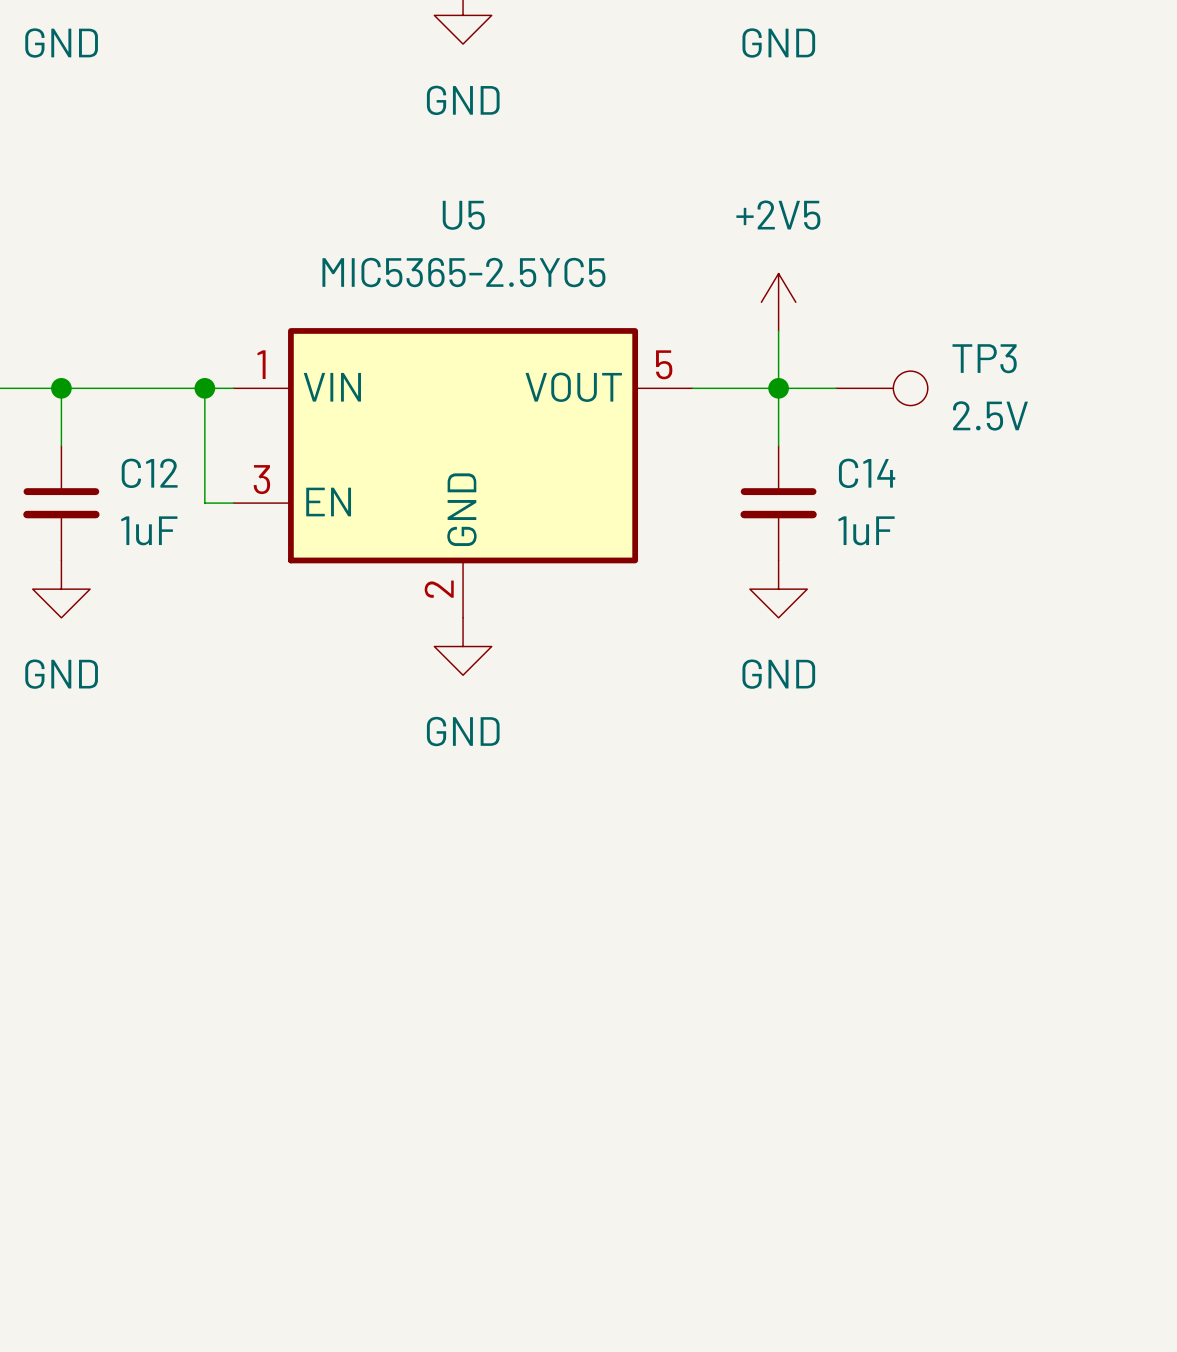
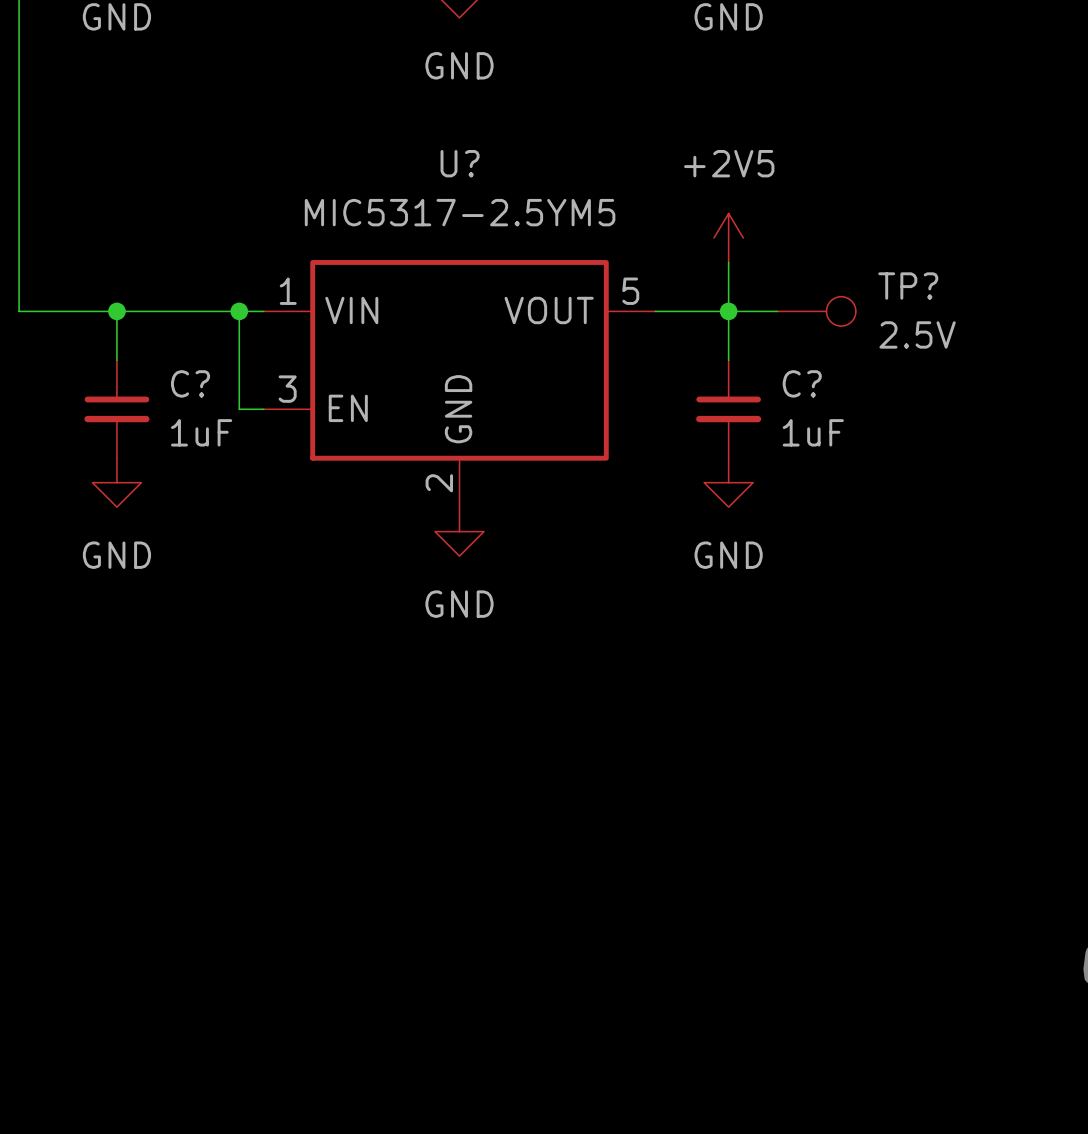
U5 name: U5 (463, 215) -> U? (460, 163)
U5 value: MIC5365-2.5YC5 (463, 272) -> MIC5317-2.5YM5 (460, 212)
TP3 name: TP3 (984, 358) -> TP? (908, 286)
C12 name: C12 (149, 473) -> C? (190, 383)
C14 name: C14 (867, 473) -> C? (802, 383)

